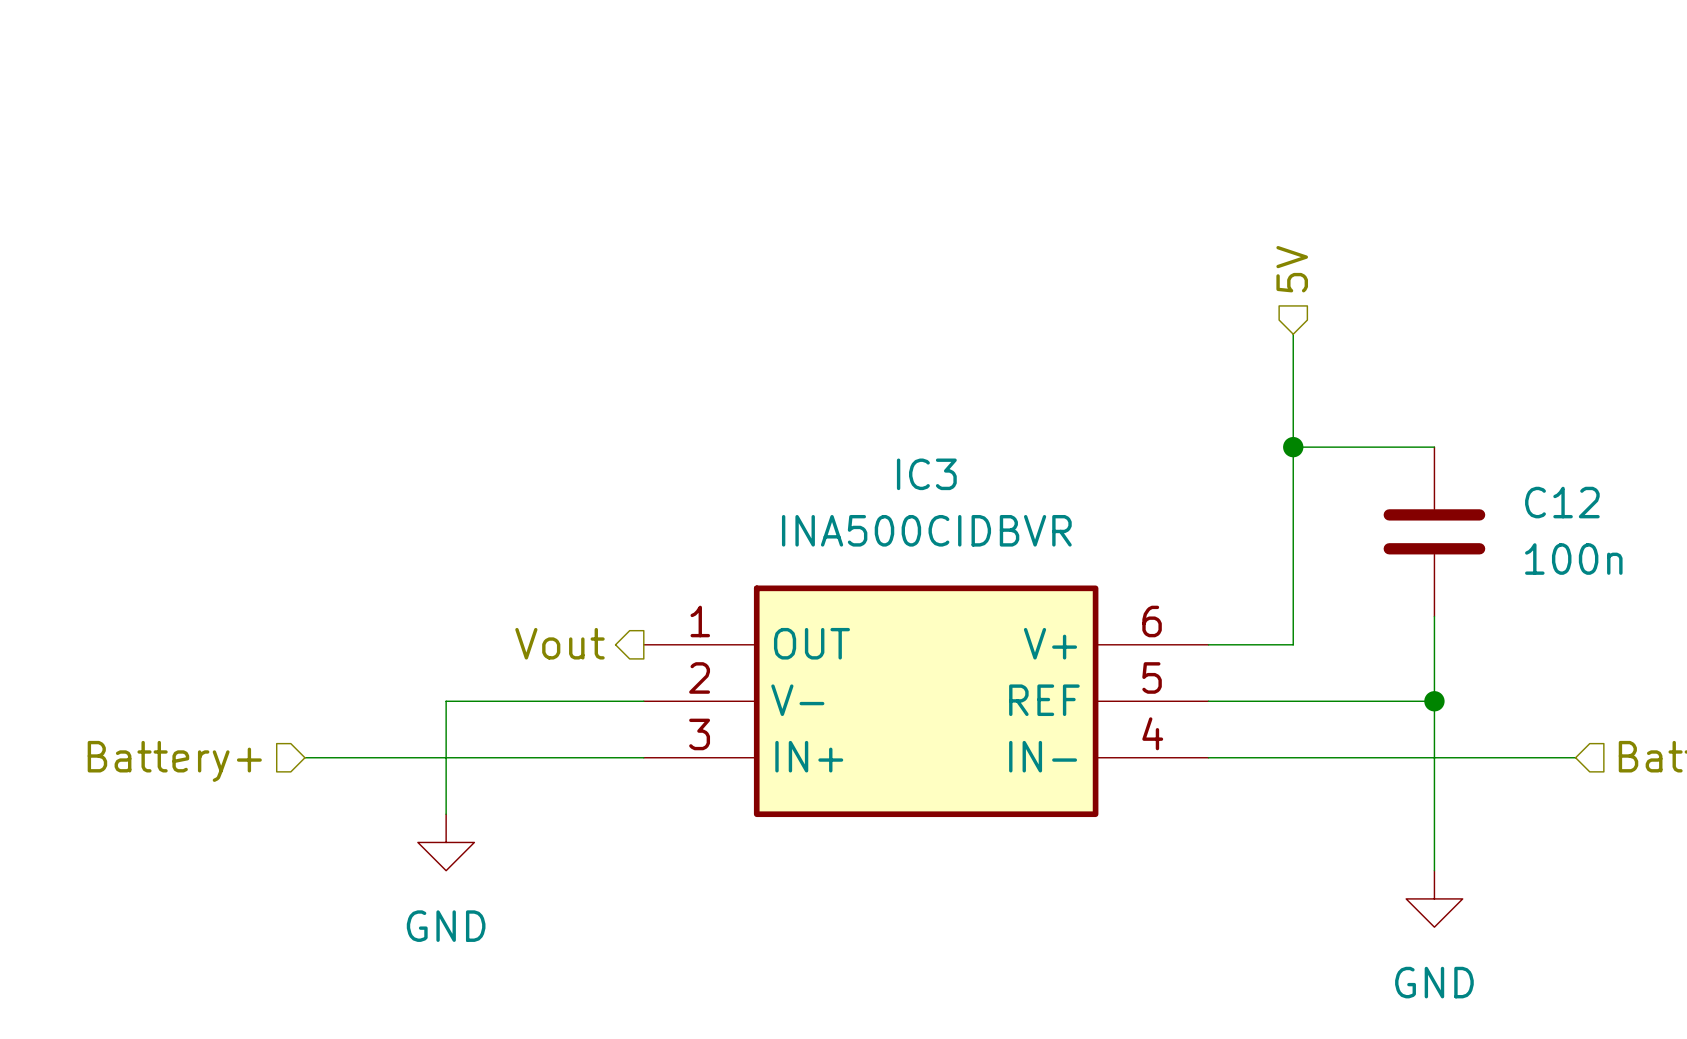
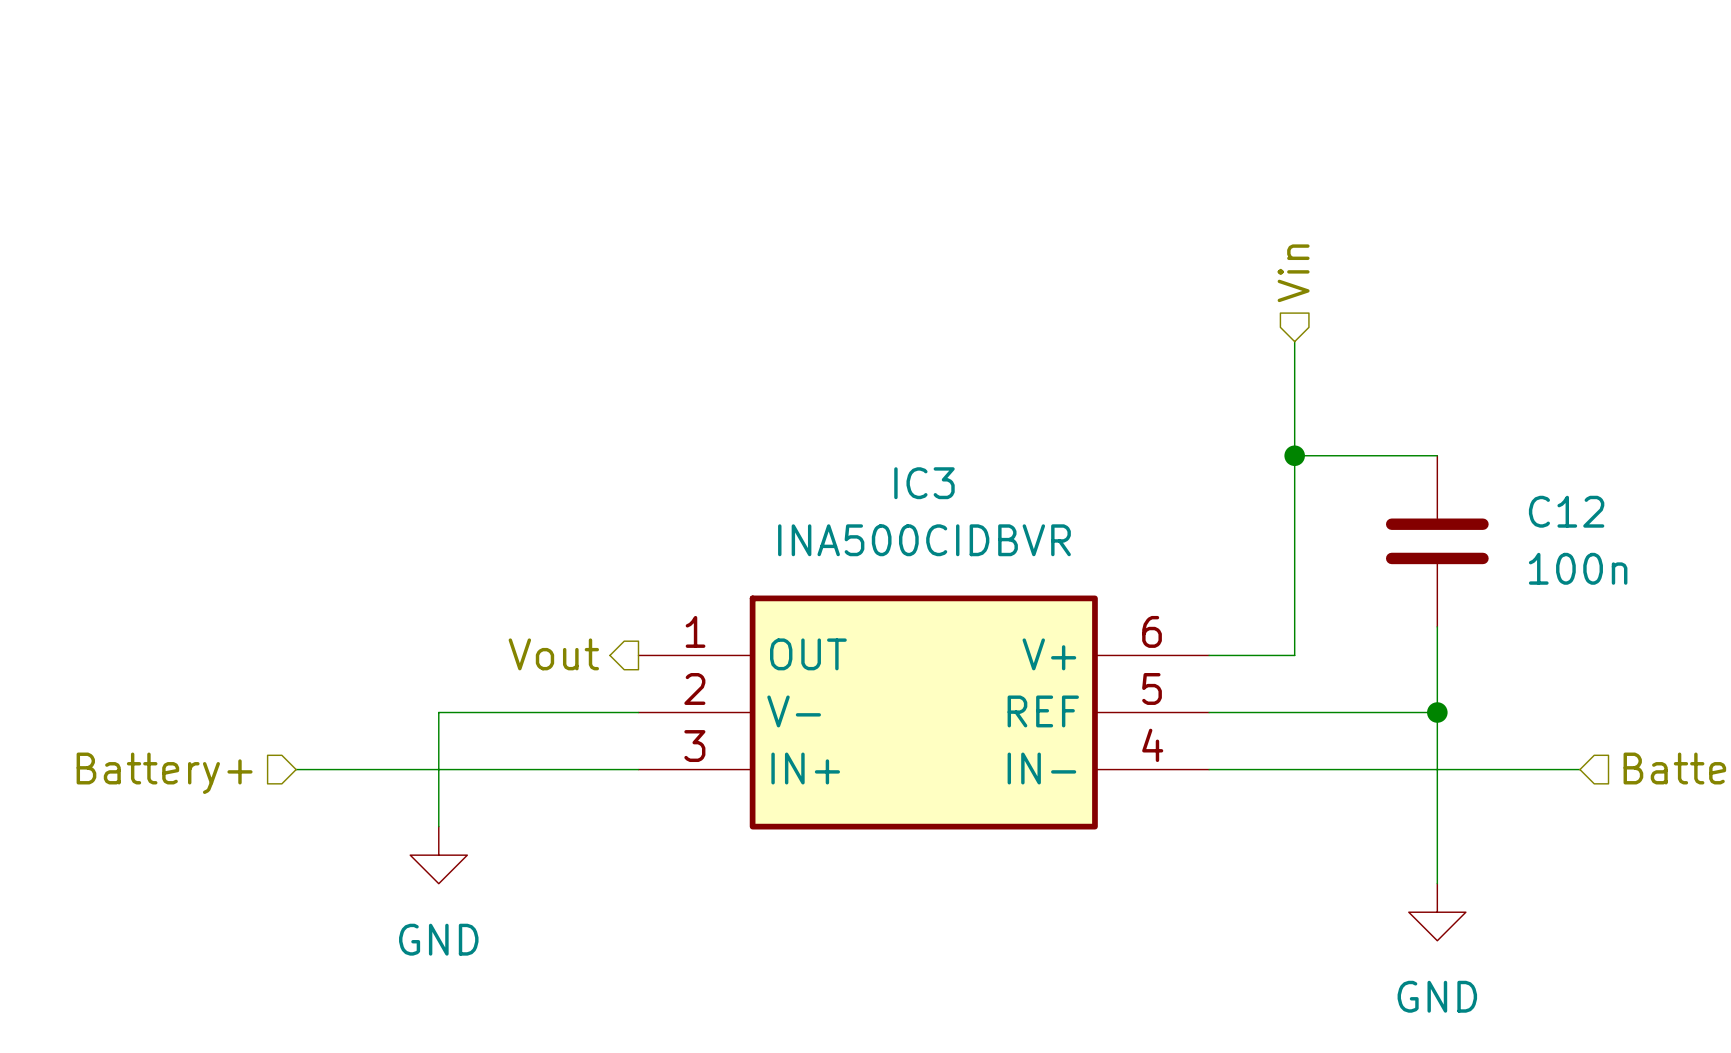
hierarchical label: 5V (1292, 269) -> Vin (1293, 273)

